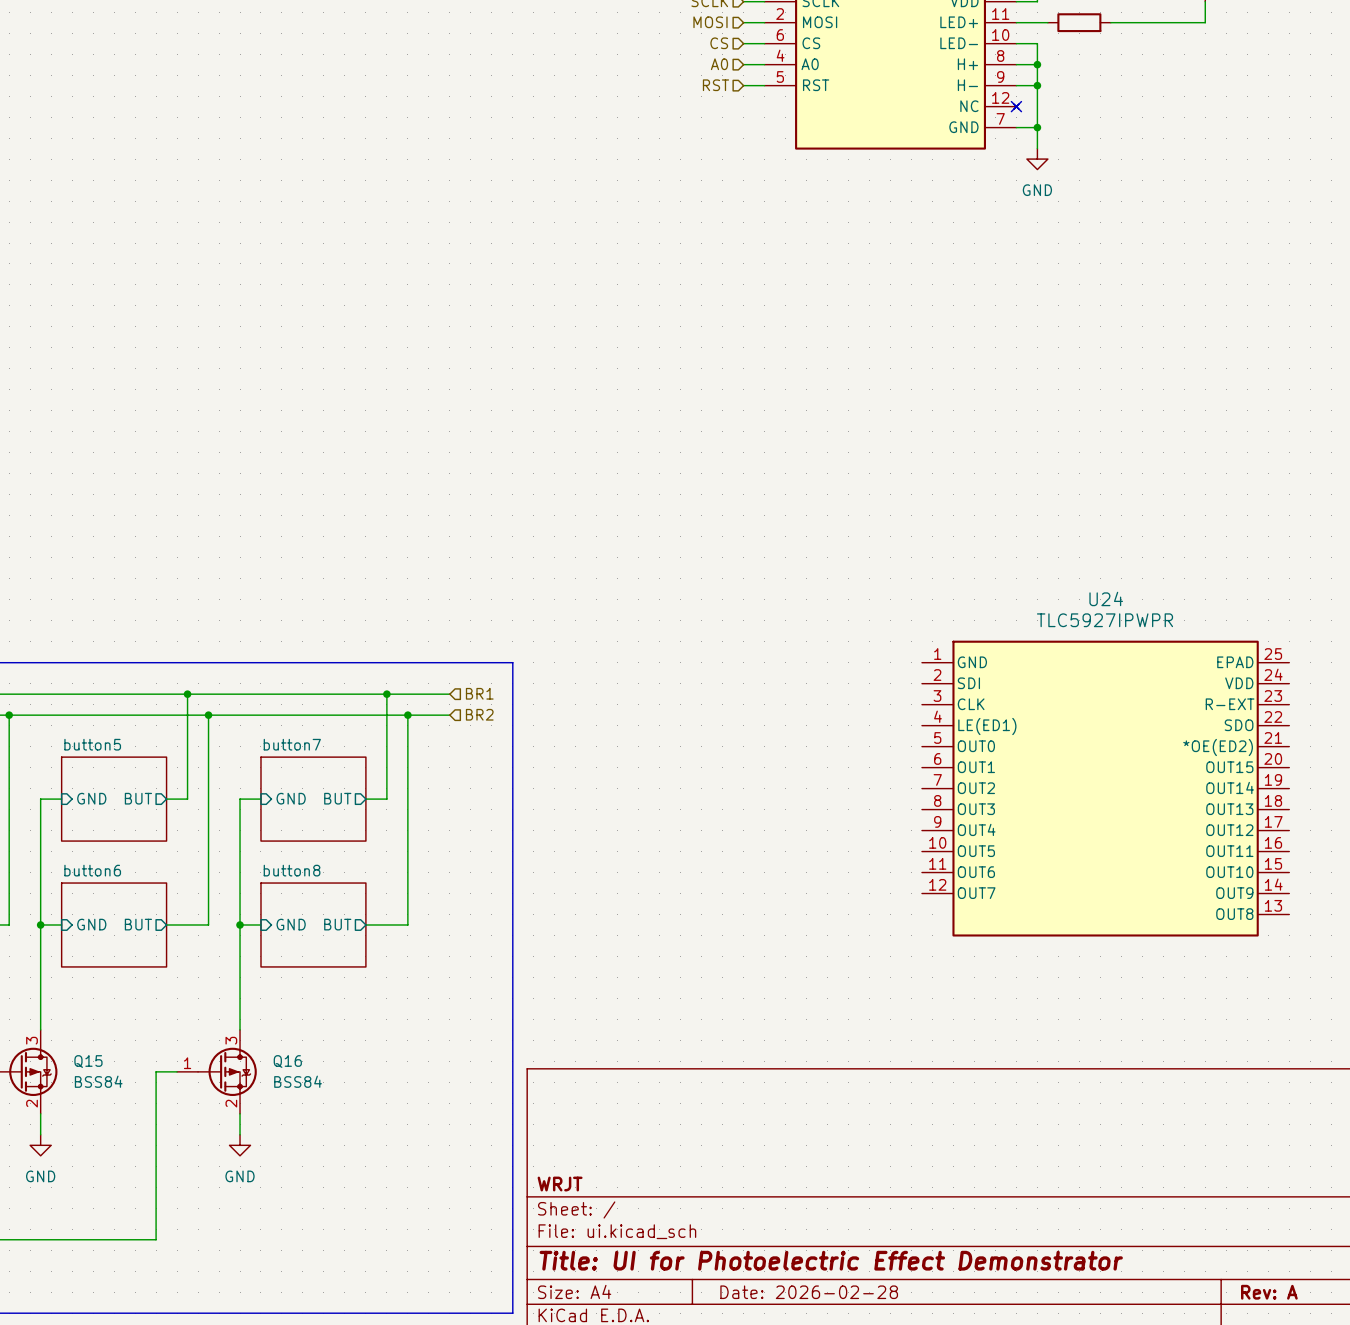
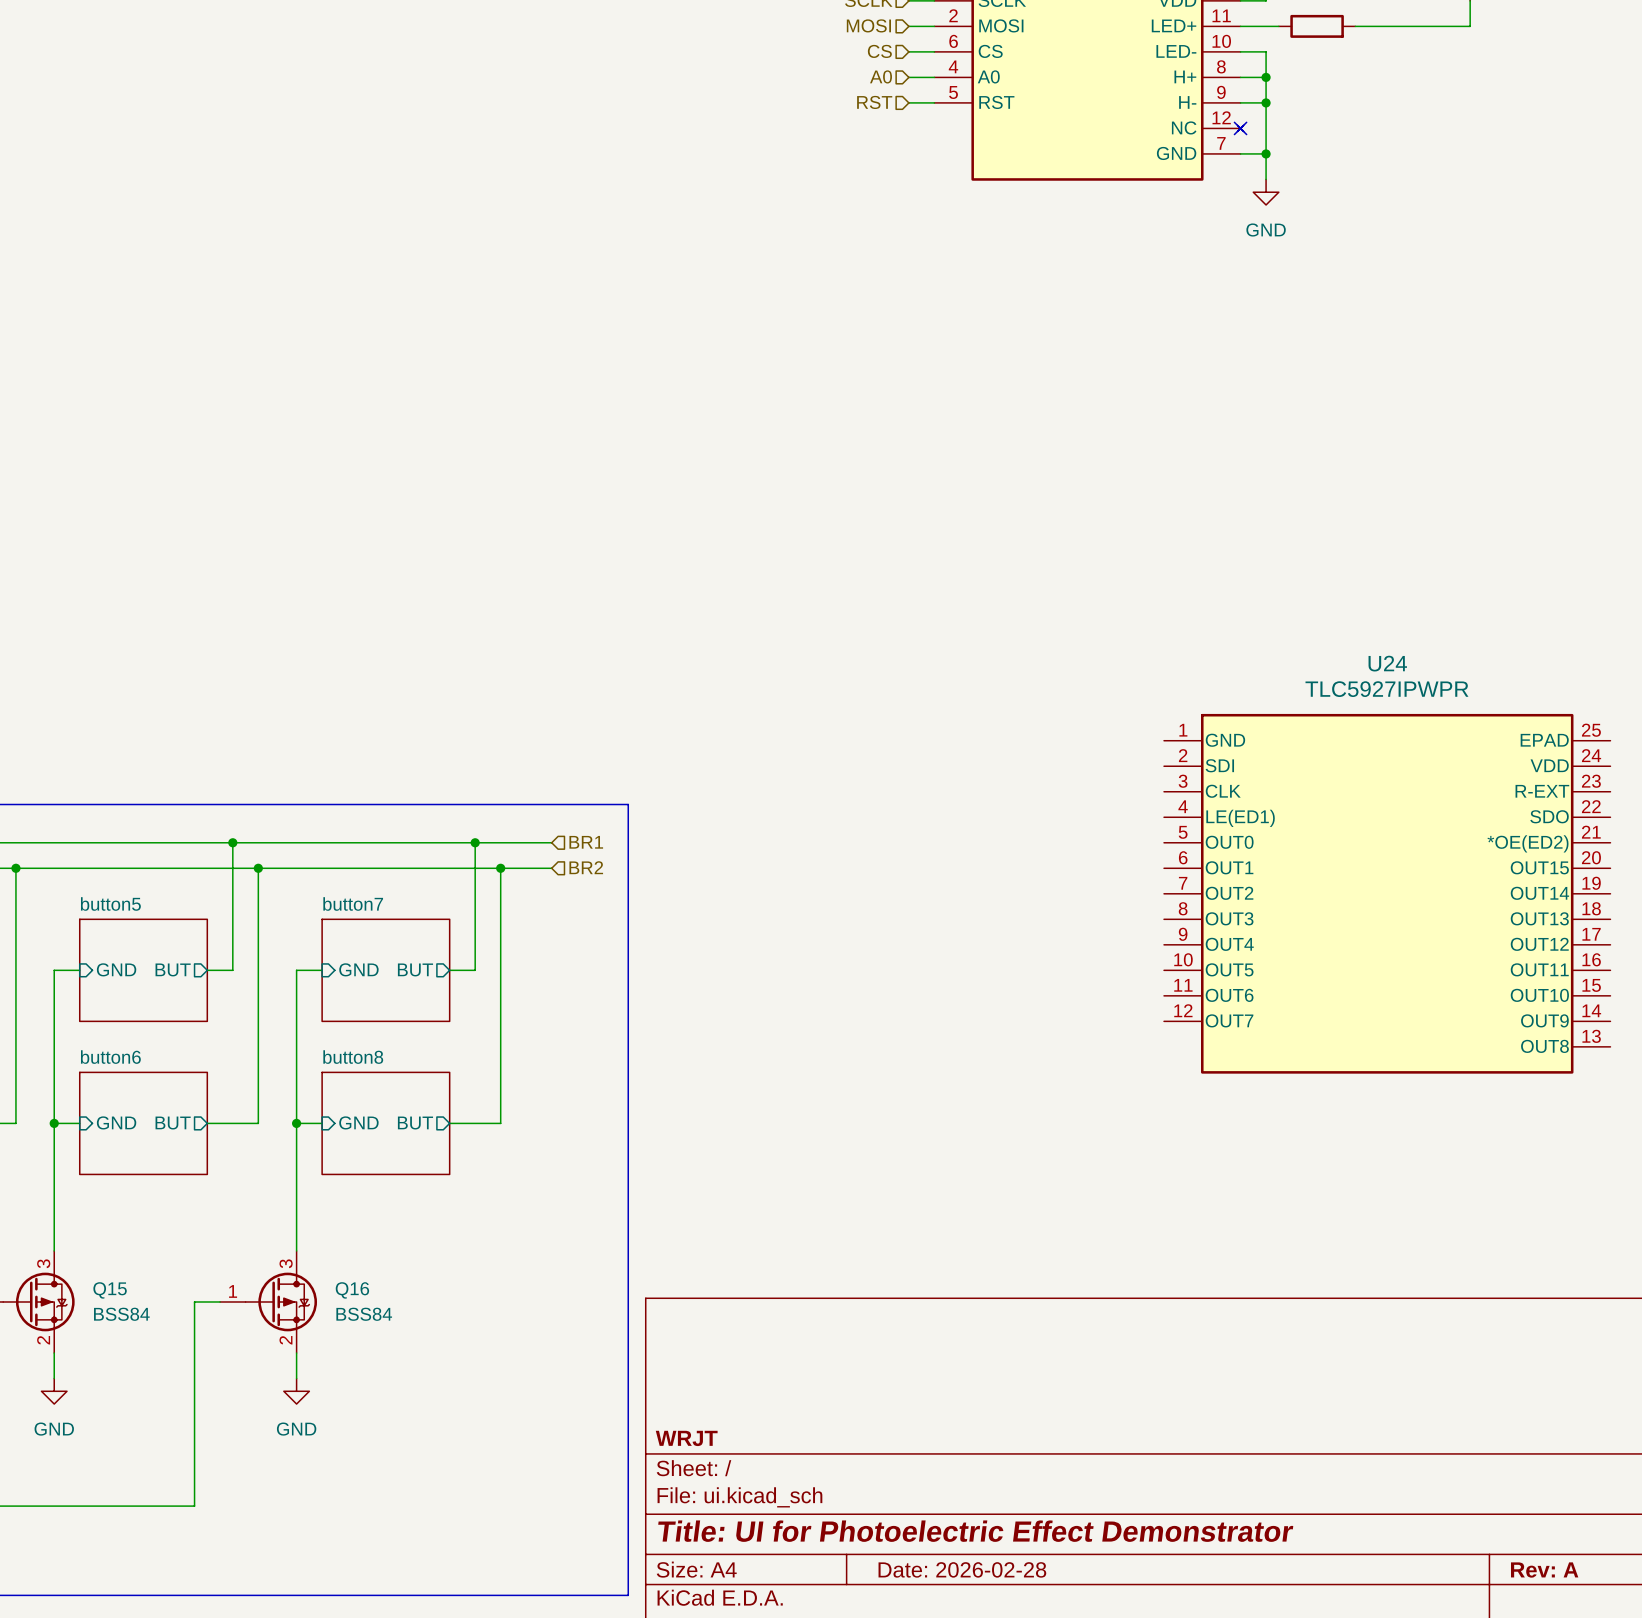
U24 position: (1105, 788) -> (1387, 893)

